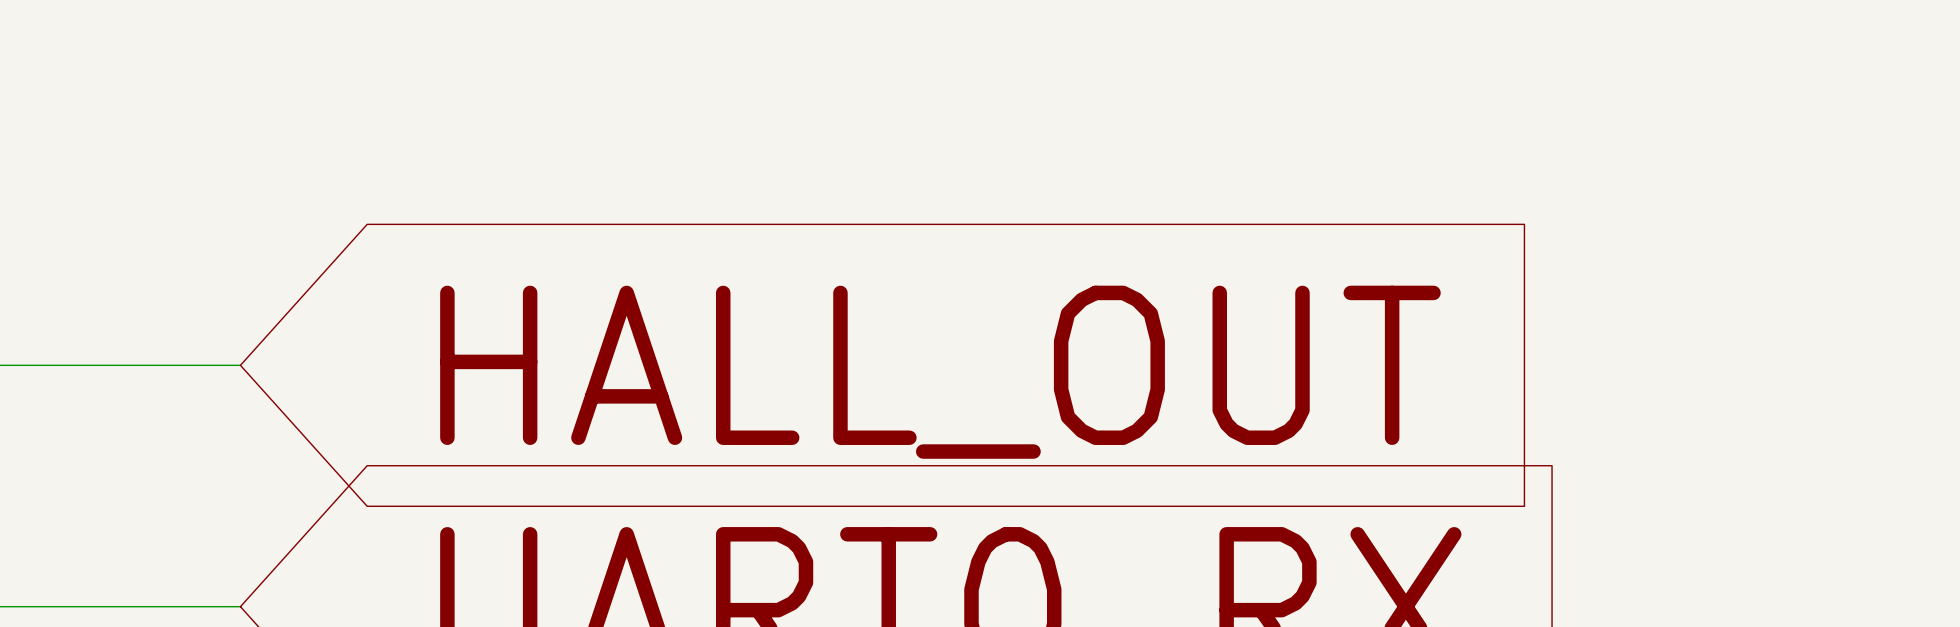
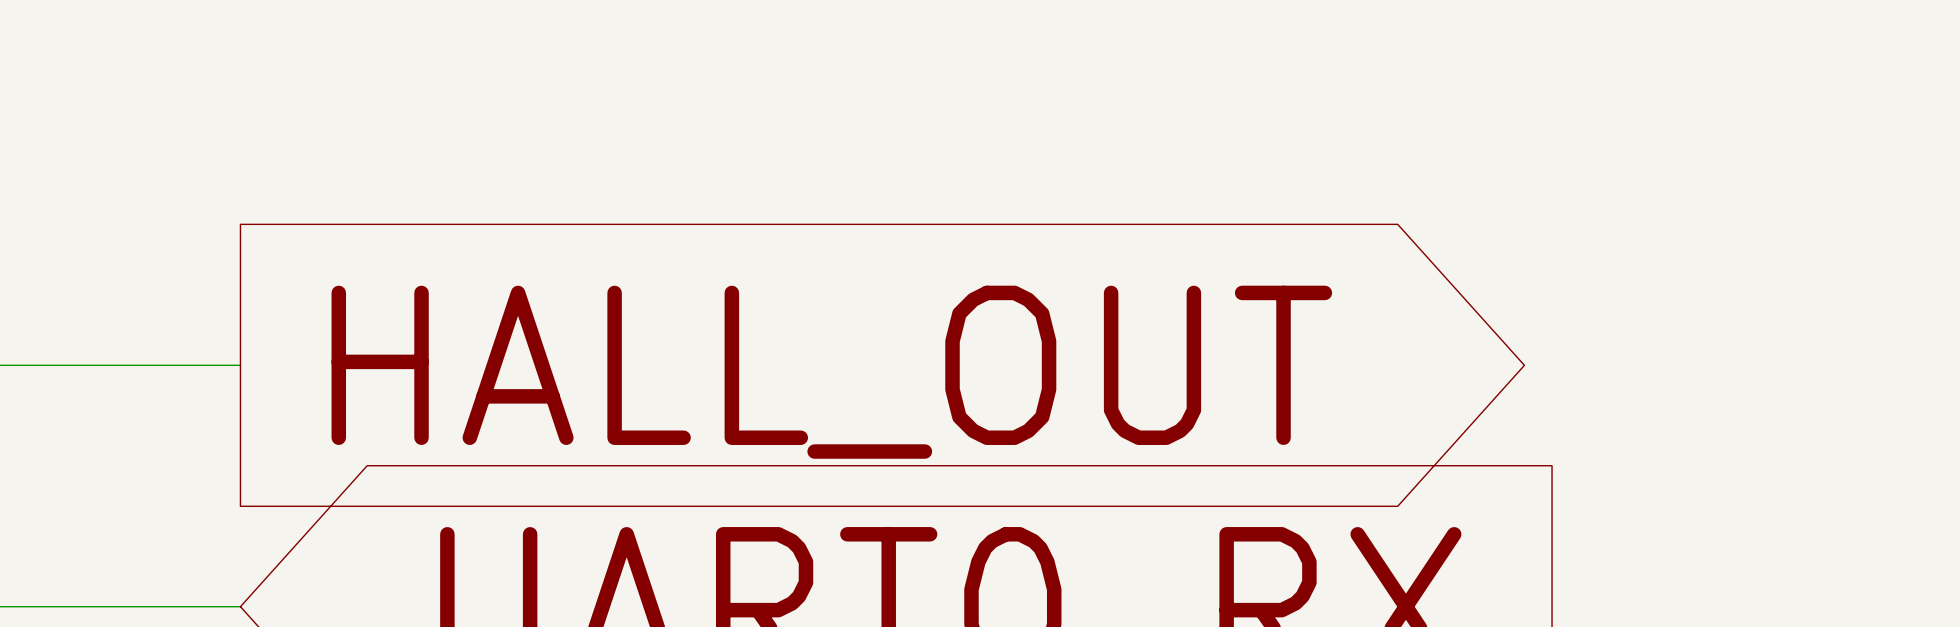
global label shape: input (940, 372) -> output (831, 372)

